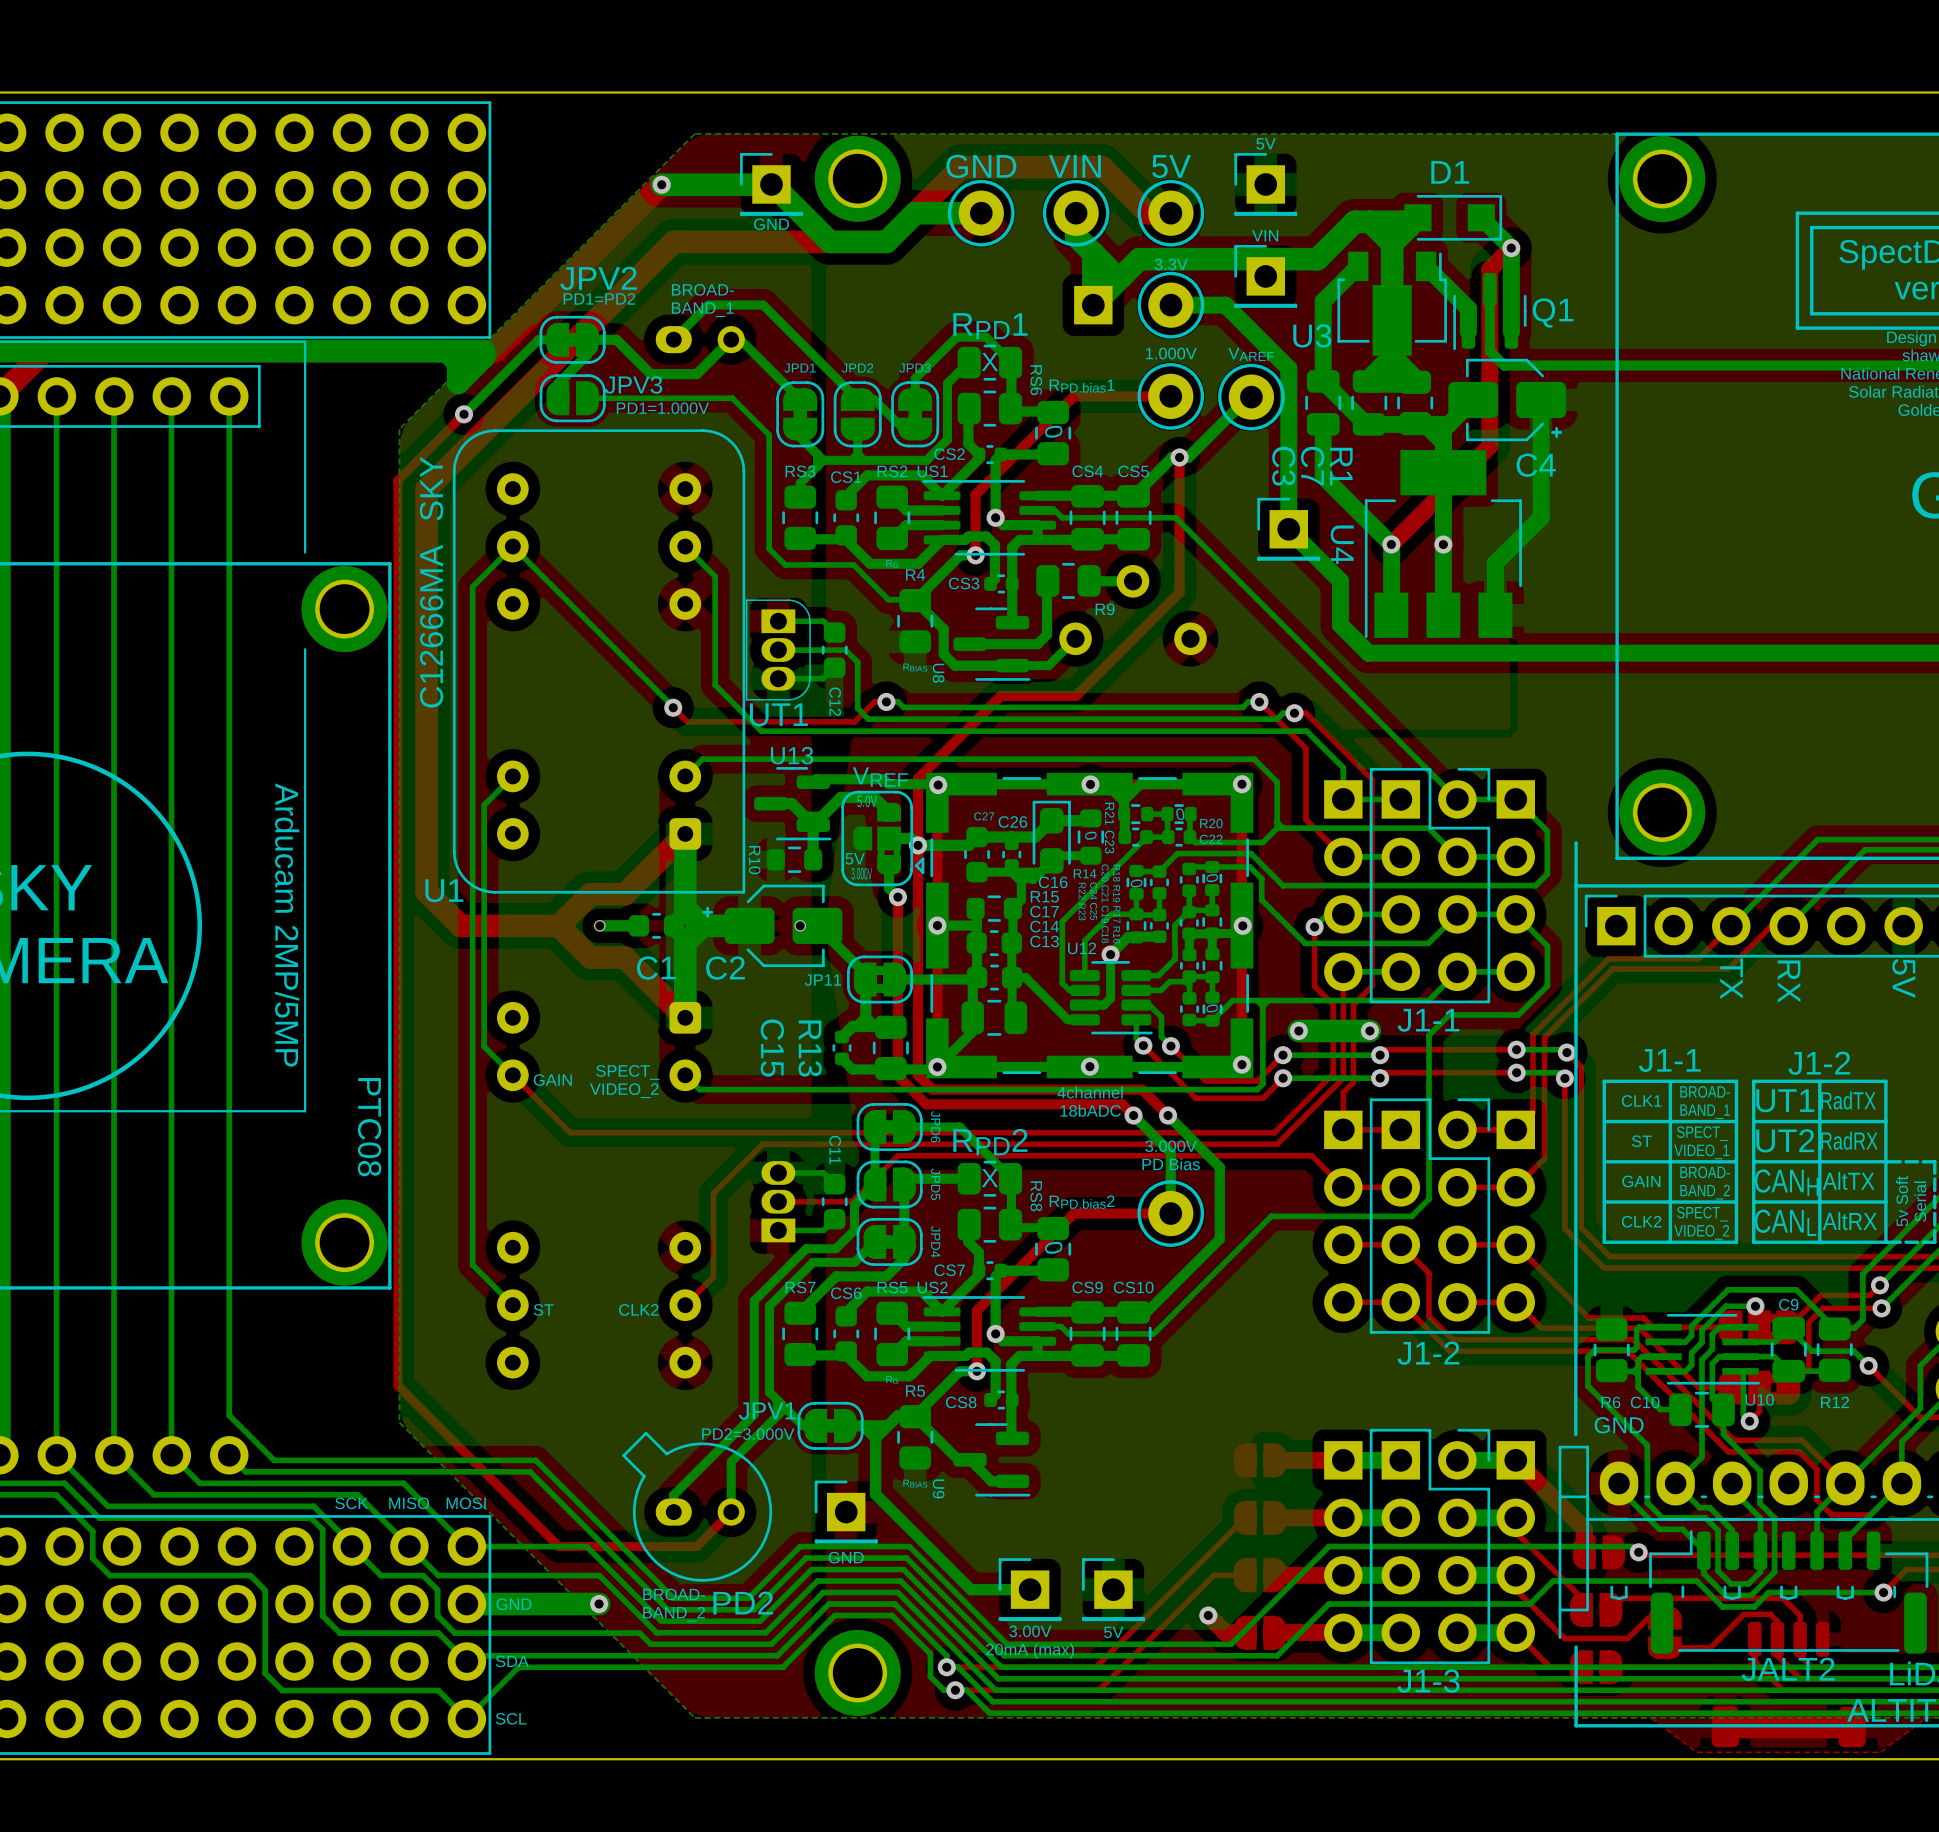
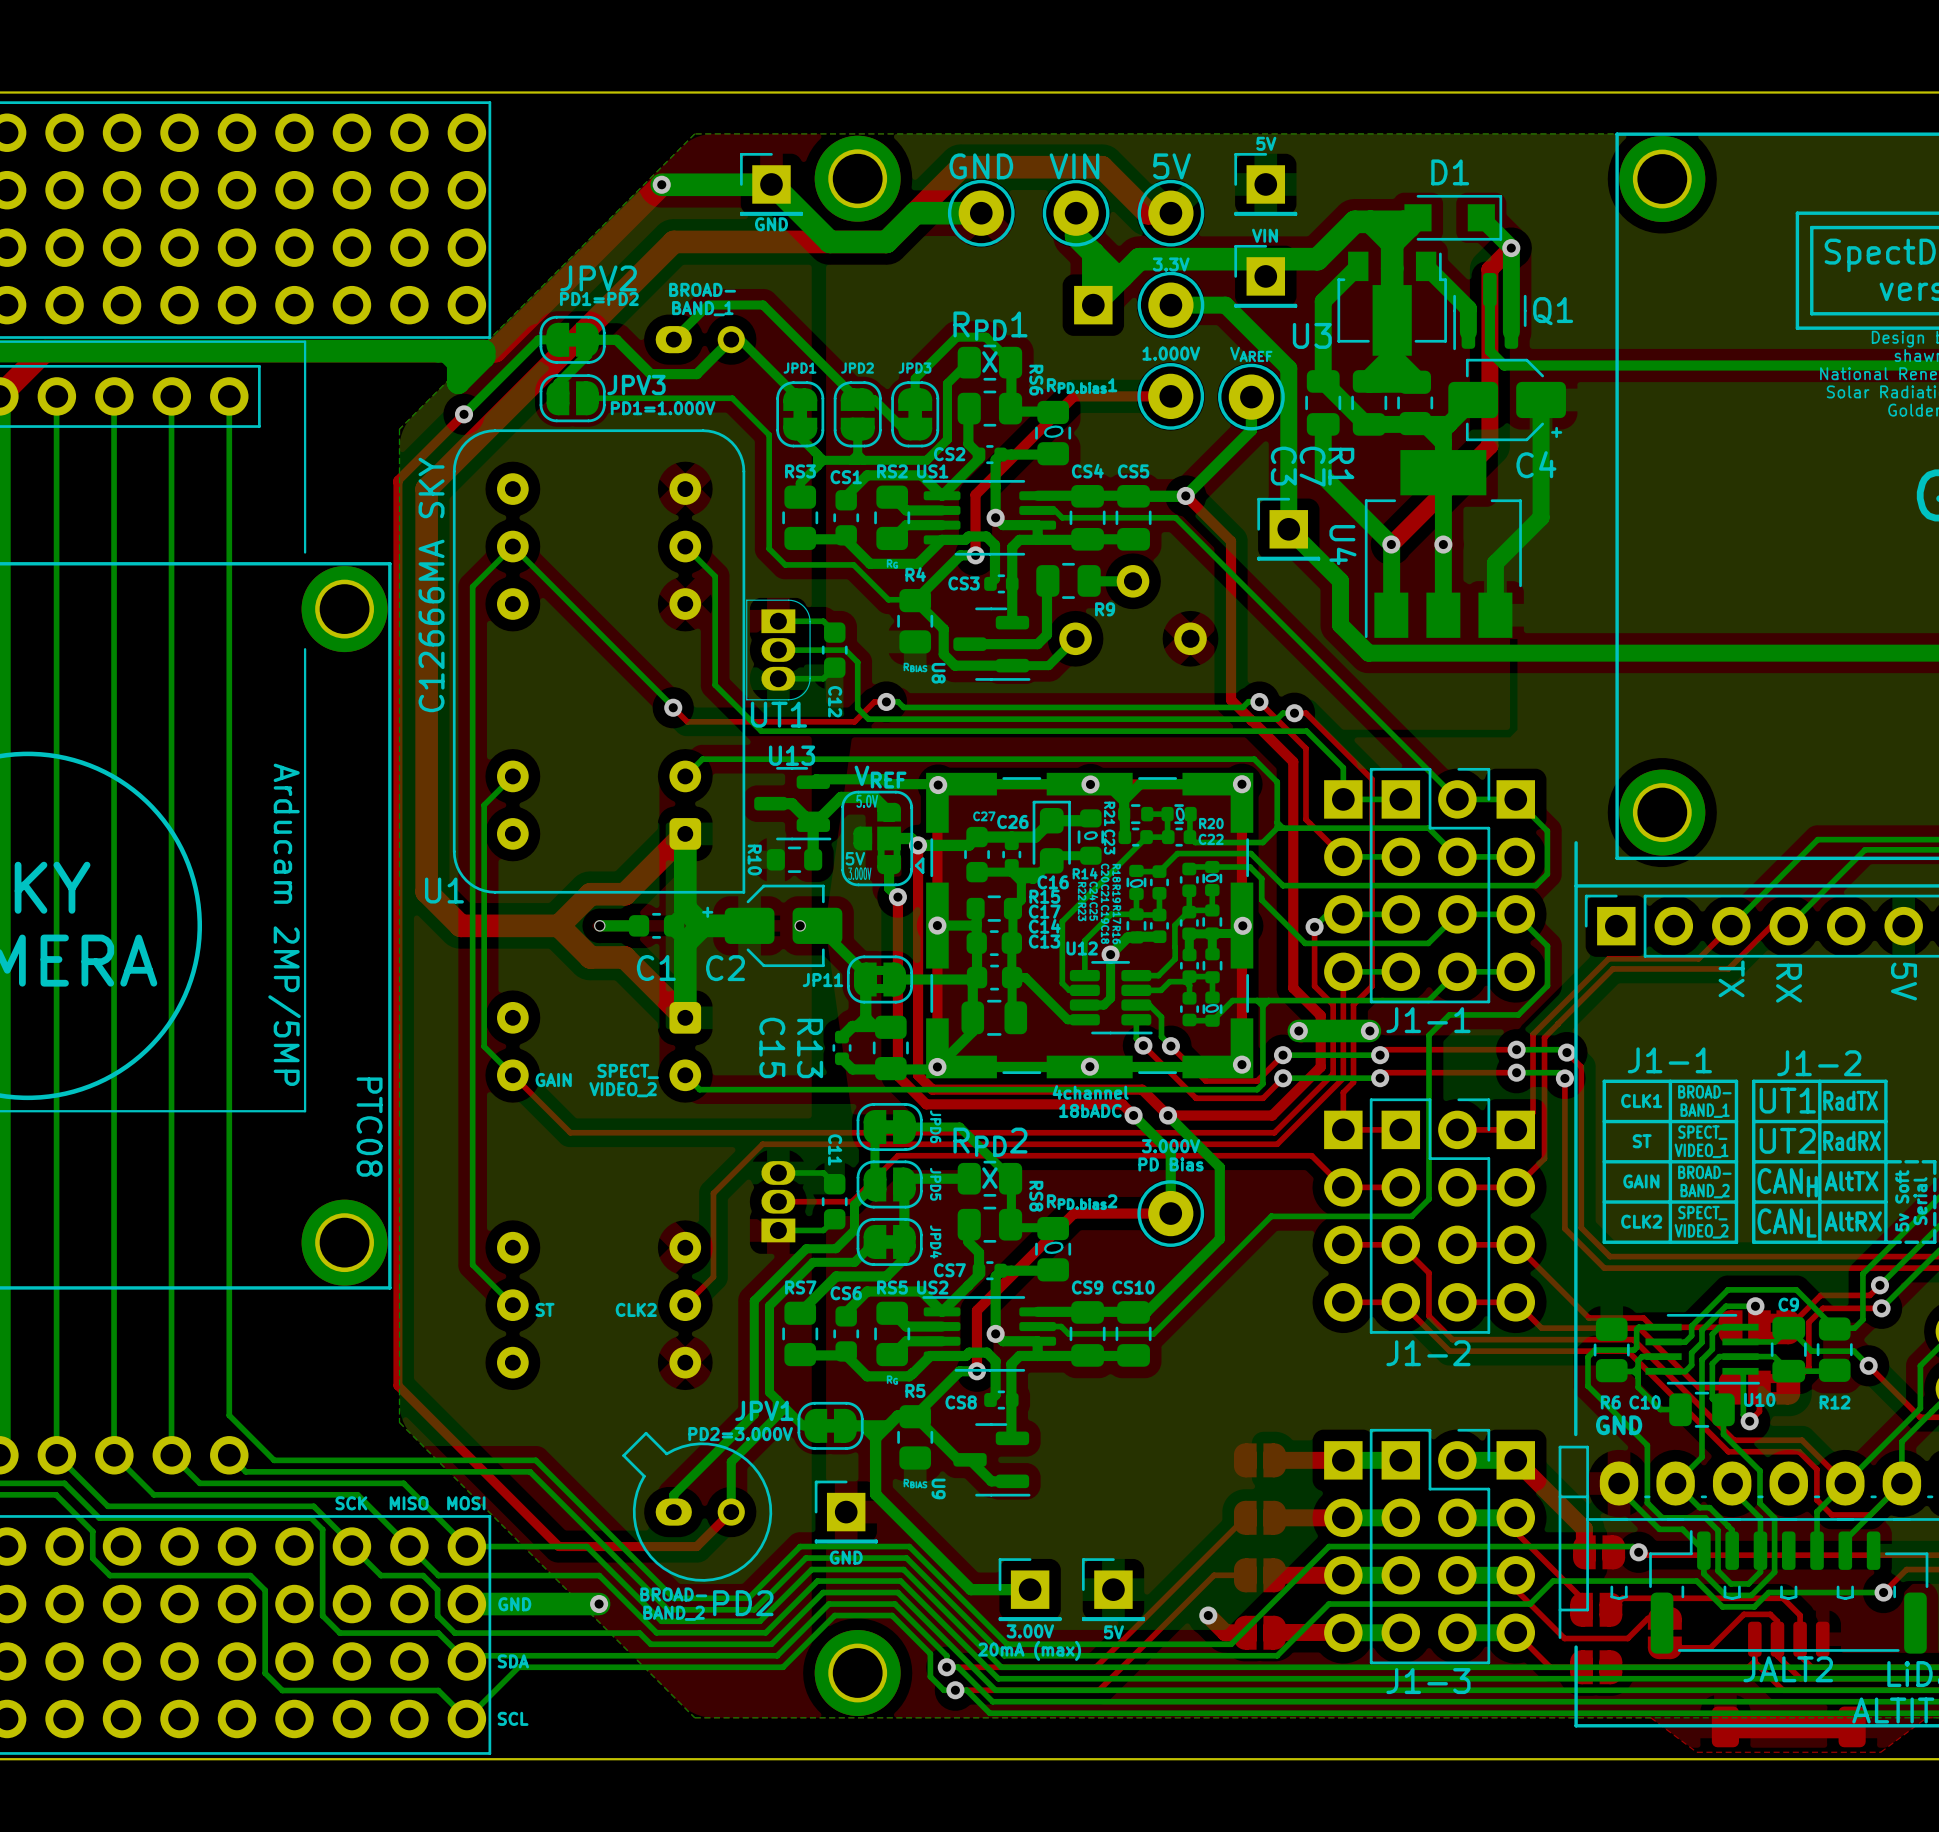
bottom track: (1251, 397) (1248, 397) (1188, 457) (1172, 457) (1133, 496) -> (1251, 397) (1251, 430) (1185, 496) (1133, 496)
top track: (1179, 457) (1179, 592) (1076, 695) (1000, 695) (918, 778) (918, 845) -> none
via position: (1179, 457) -> (1185, 495)
top track: none -> (1185, 495) (1231, 541) (1231, 699) (1251, 720)
top track: none -> (1252, 720) (1293, 761) (1293, 988) (1320, 1015) (1320, 1067) (1272, 1115) (1168, 1115)

